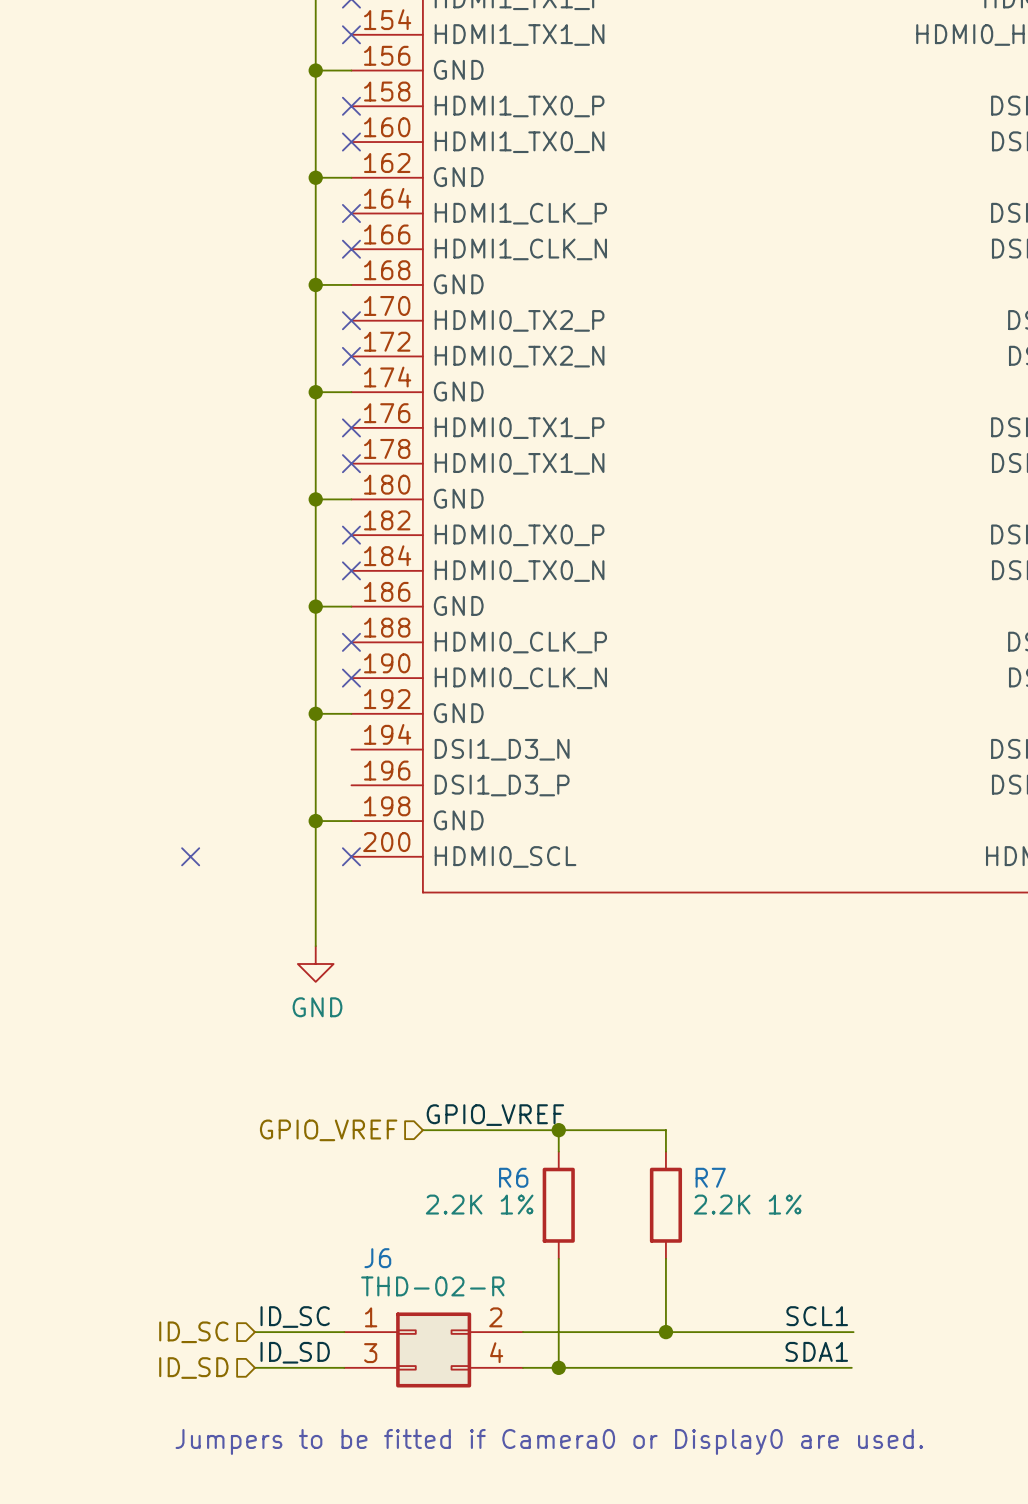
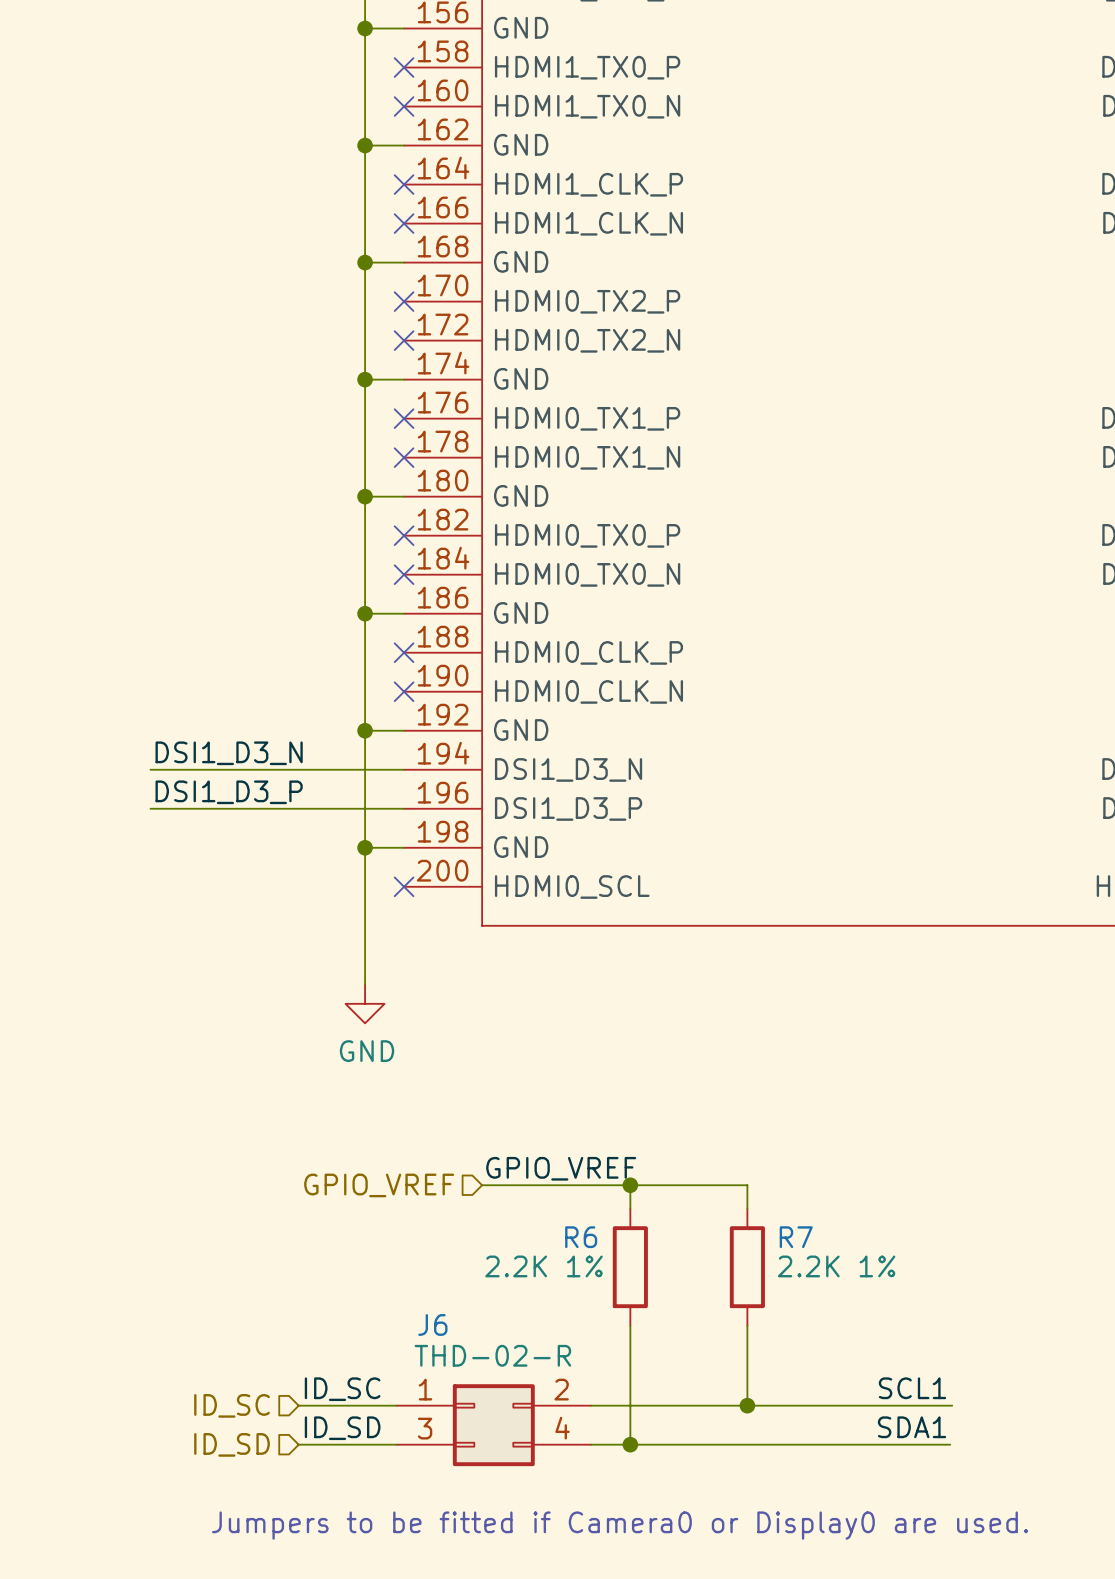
label: none -> DSI1_D3_N (229, 753)
wire: none -> (150, 769) (404, 769)
label: none -> DSI1_D3_P (229, 792)
wire: none -> (150, 808) (404, 808)
no-connect mark: (190, 856) -> none

